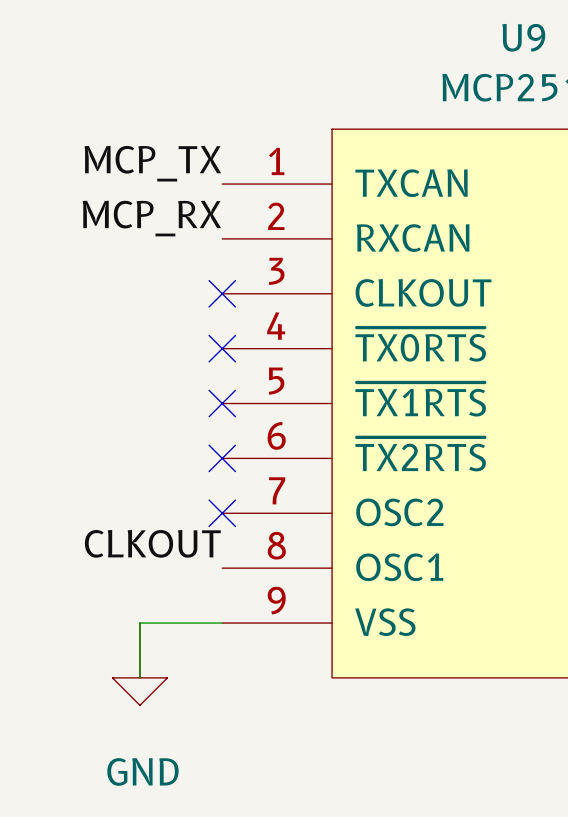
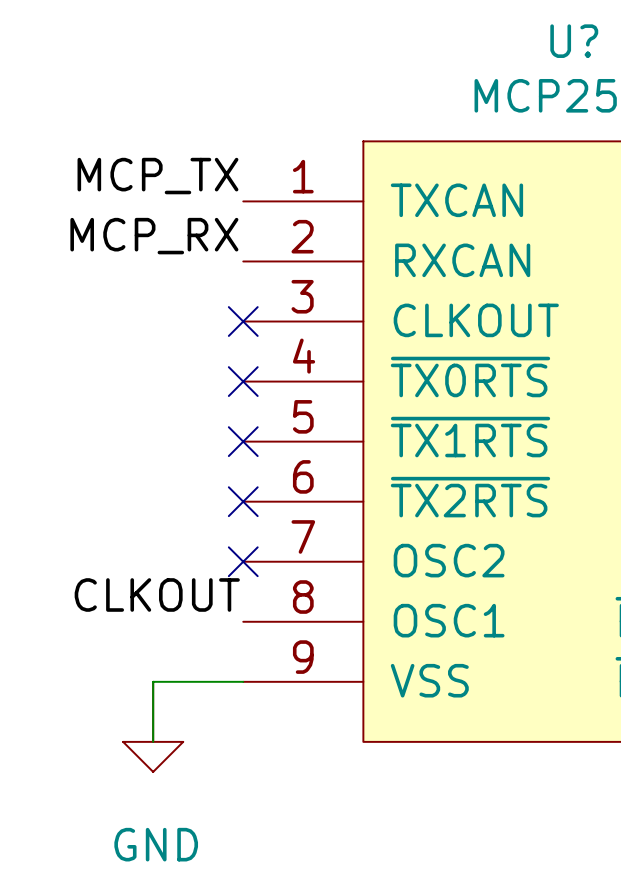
U9 name: U9 (523, 37) -> U? (574, 41)

